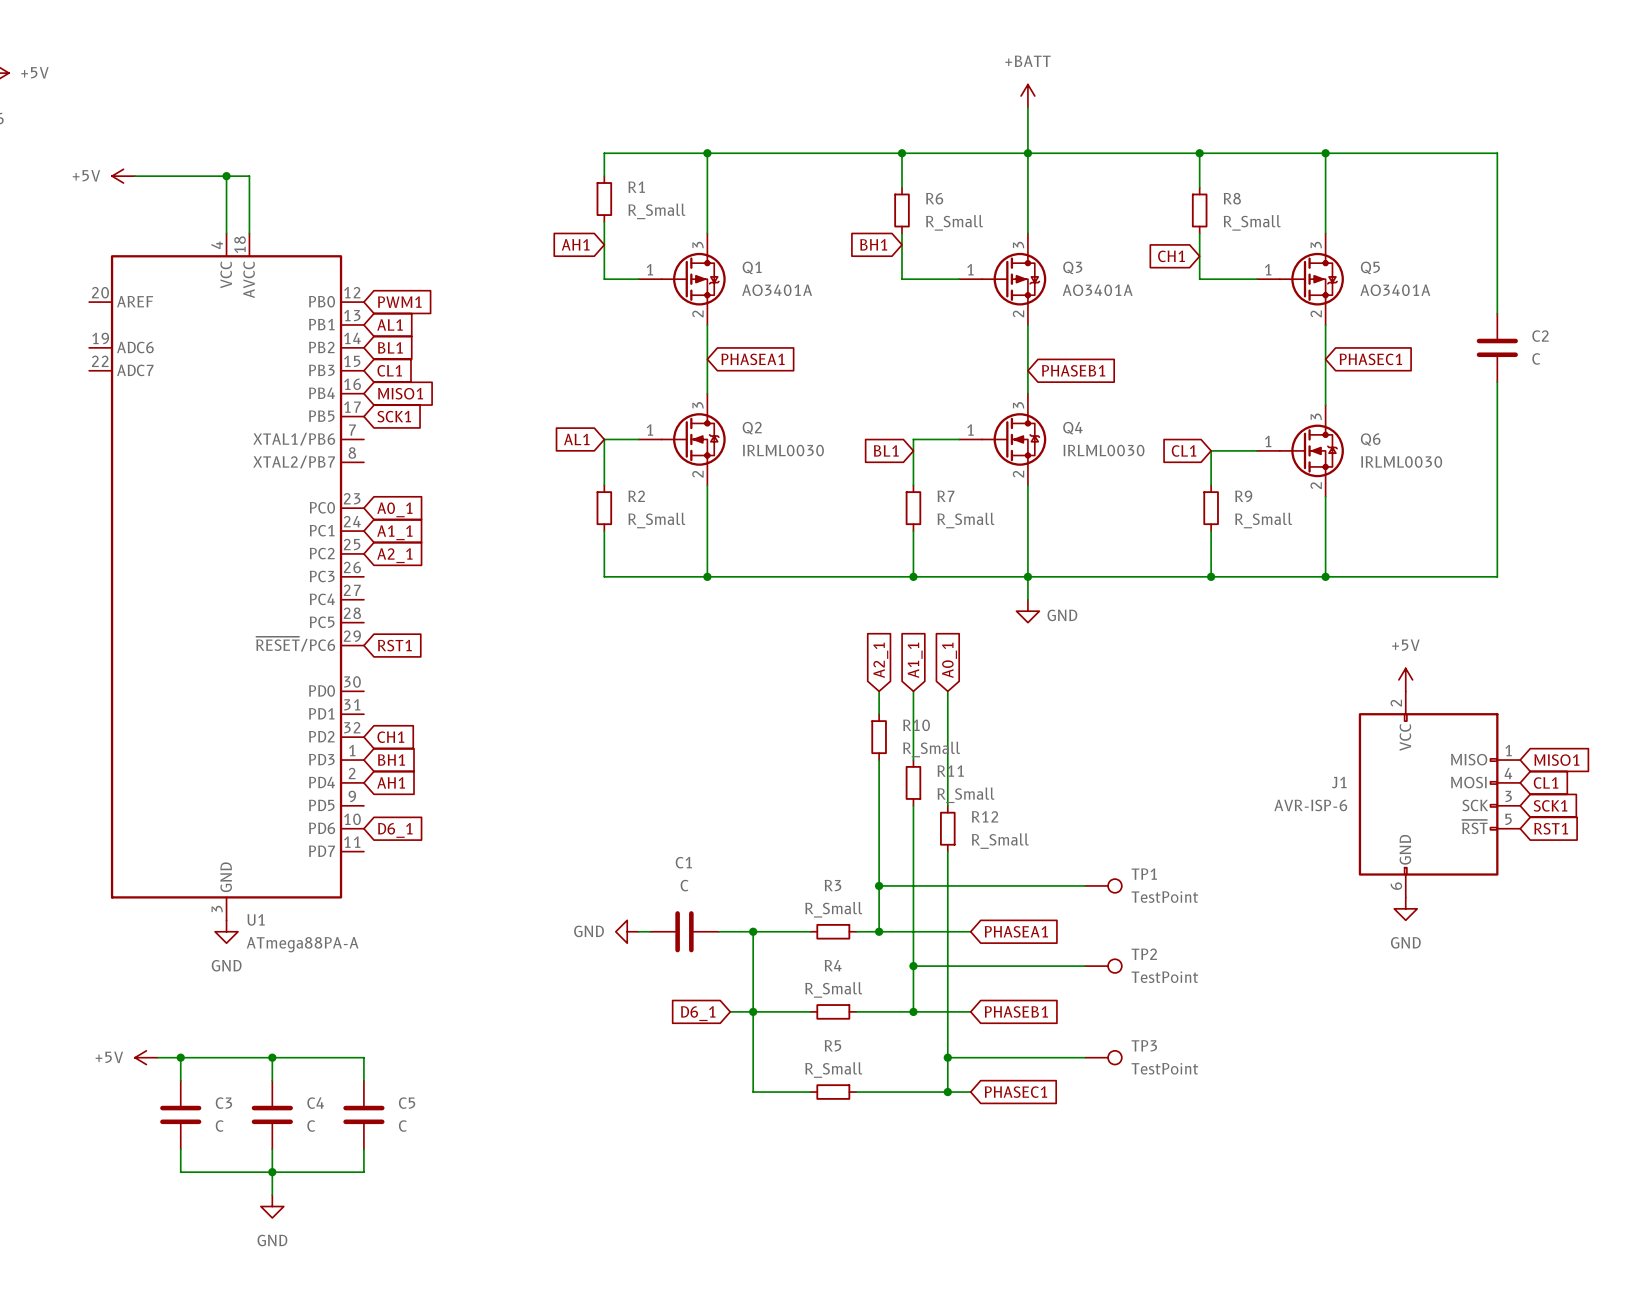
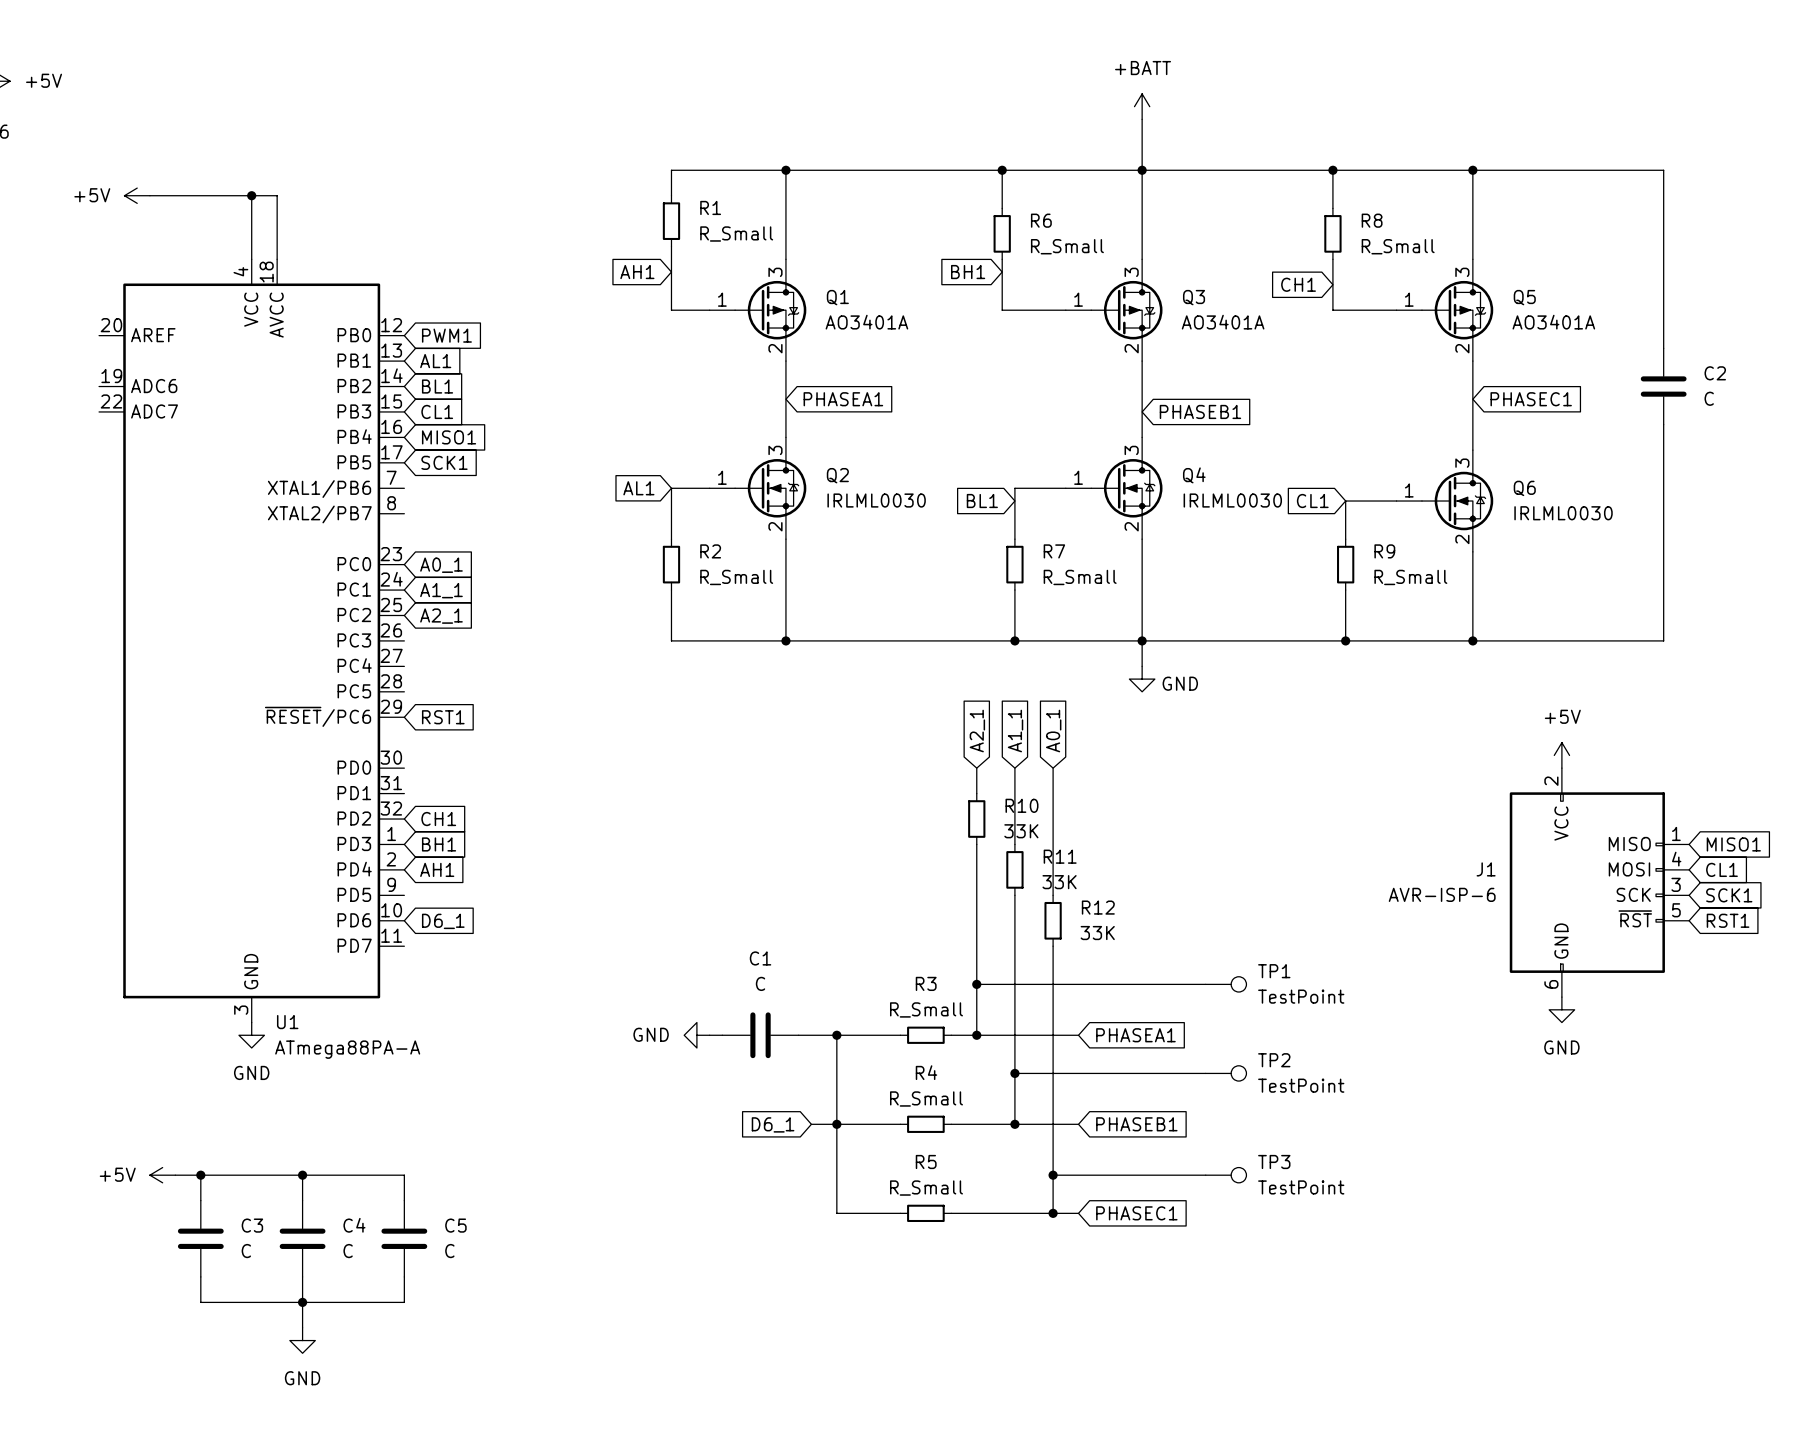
R10 value: R_Small (931, 749) -> 33K (1021, 831)
R11 value: R_Small (966, 795) -> 33K (1059, 882)
R12 value: R_Small (1000, 841) -> 33K (1097, 933)

